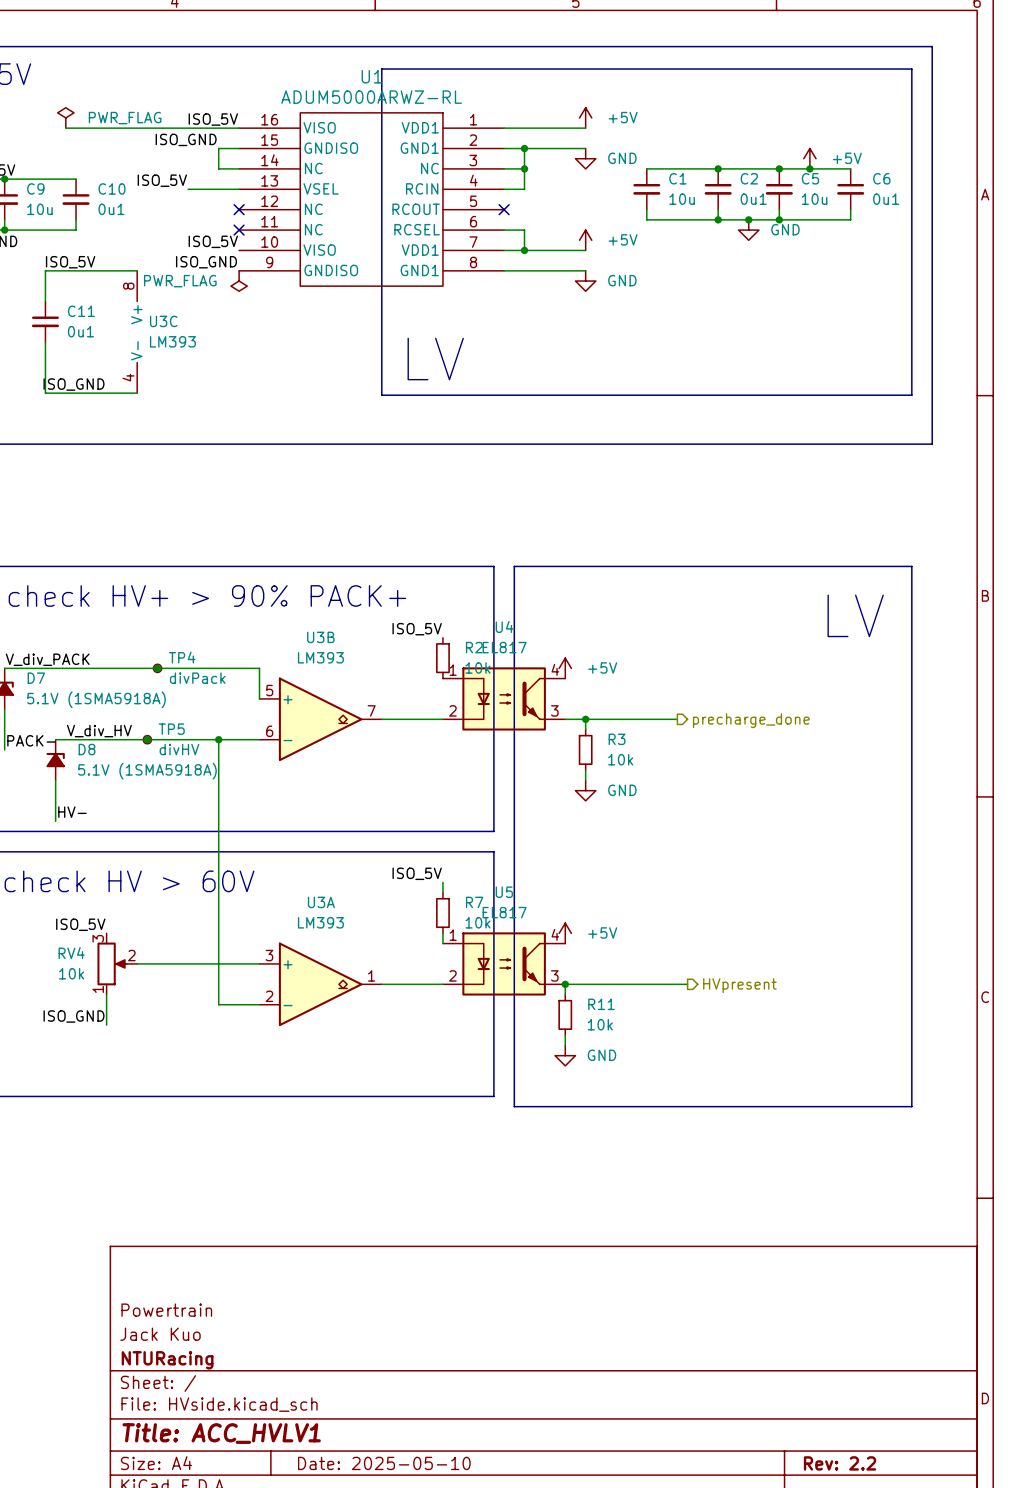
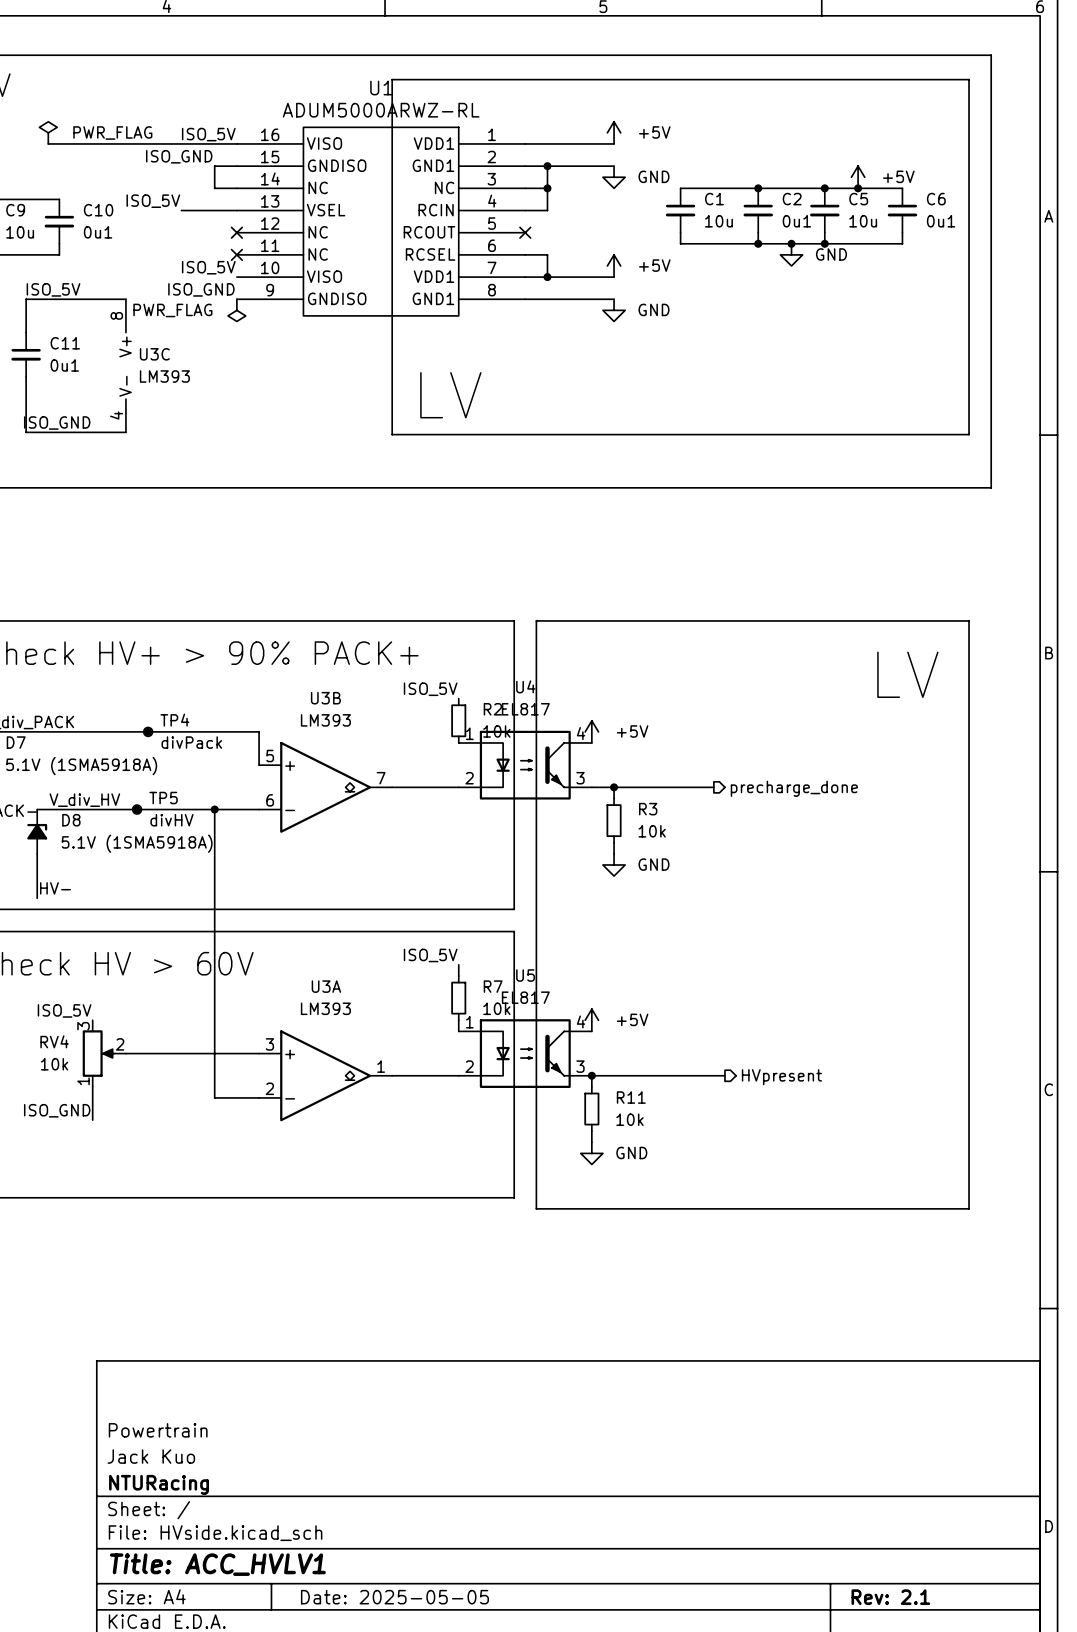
title block: Date: 2025-05-10 (384, 1463) -> Date: 2025-05-05 (394, 1597)
title block: Rev: 2.2 (840, 1463) -> Rev: 2.1 (890, 1597)

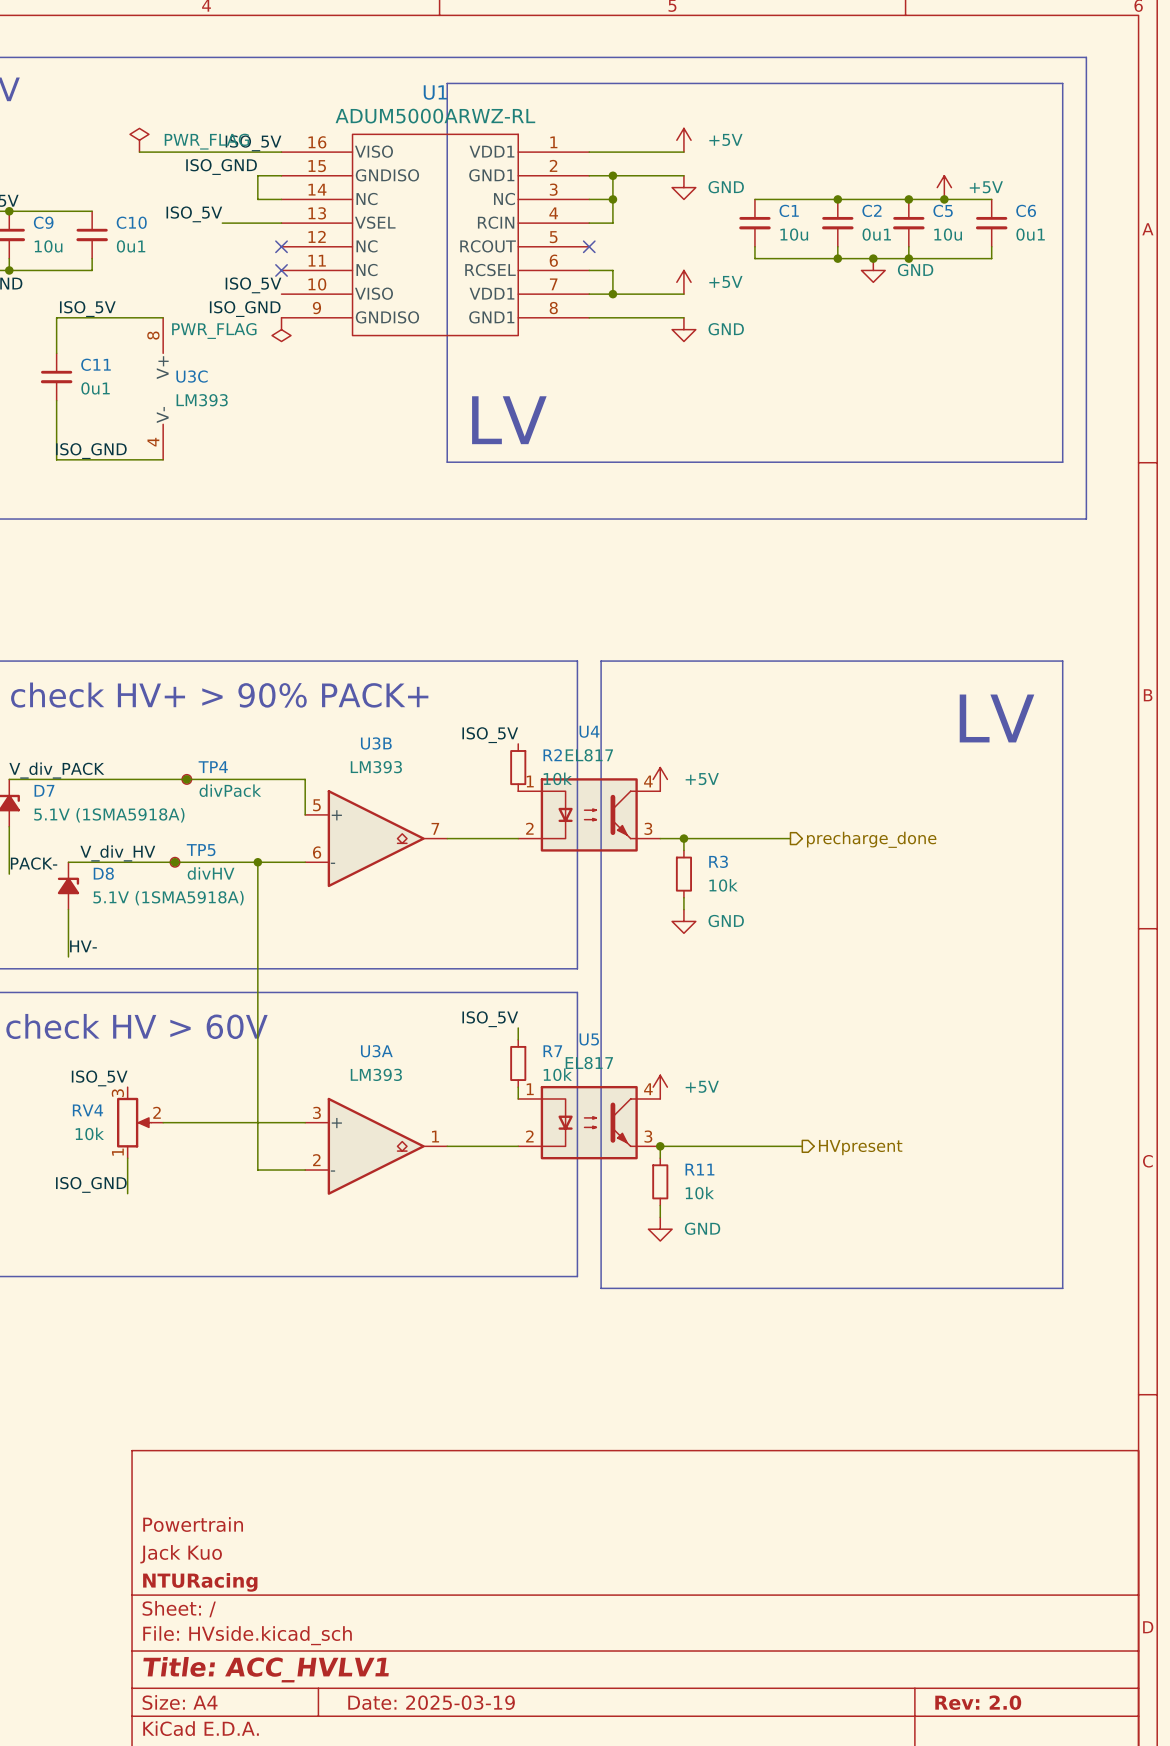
power symbol position: PWR_FLAG (48, 132) -> PWR_FLAG (139, 140)
wire: (48, 143) (103, 143) -> none
title block: Date: 2025-05-05 (394, 1597) -> Date: 2025-03-19 (431, 1702)
title block: Rev: 2.1 (890, 1597) -> Rev: 2.0 (978, 1702)

